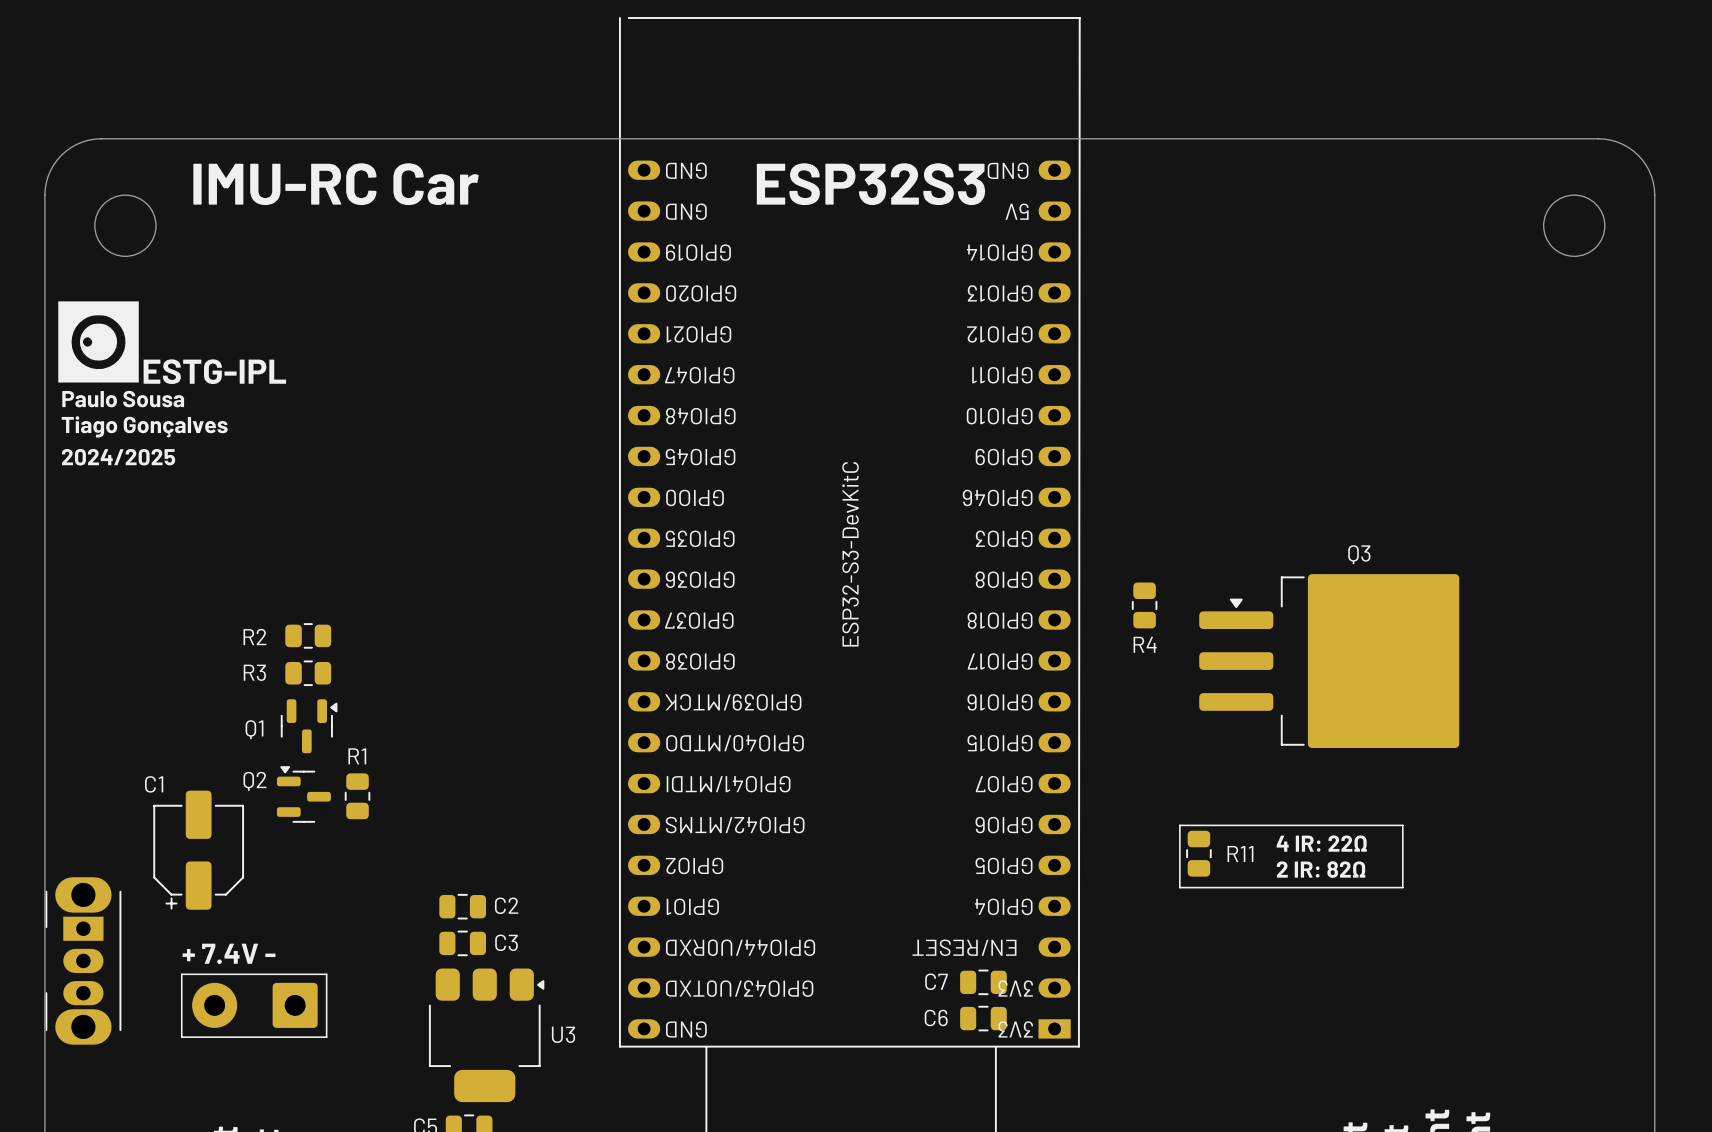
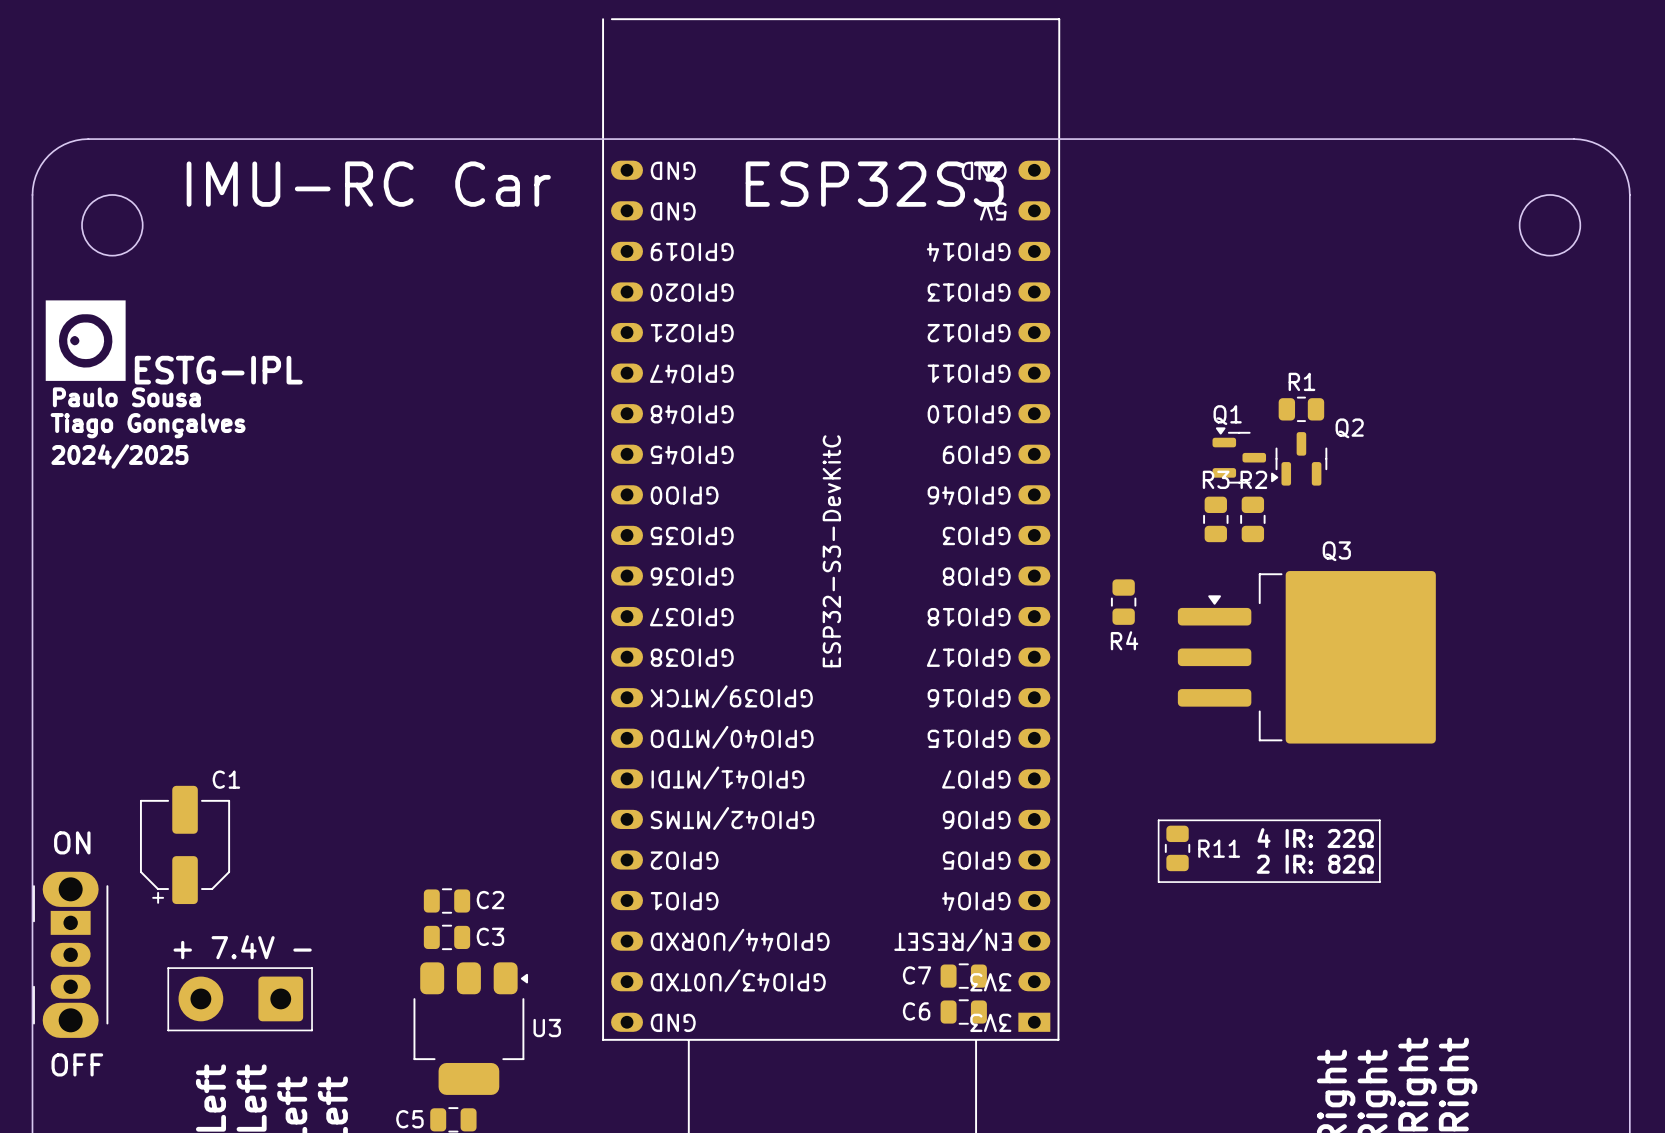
R2 rotation: 0° (308, 635) -> 90° clockwise (1252, 519)
R2 position: (308, 635) -> (1252, 519)
R3 rotation: 0° (308, 673) -> 90° clockwise (1215, 519)
R3 position: (308, 673) -> (1215, 519)
Q1 rotation: 0° (309, 726) -> 90° counterclockwise (1239, 455)
Q1 position: (309, 726) -> (1239, 455)
Q1 name position: Q1 (254, 729) -> Q1 (1227, 415)
Q2 name position: Q2 (254, 781) -> Q2 (1349, 428)
C1 name position: C1 (154, 784) -> C1 (226, 779)
Q2 rotation: 0° (303, 794) -> 90° counterclockwise (1299, 458)
Q2 position: (303, 794) -> (1299, 458)
R1 rotation: 0° (357, 796) -> 90° clockwise (1301, 409)
R1 position: (357, 796) -> (1301, 409)
text: none -> ON (72, 842)
text: none -> OFF (77, 1064)

